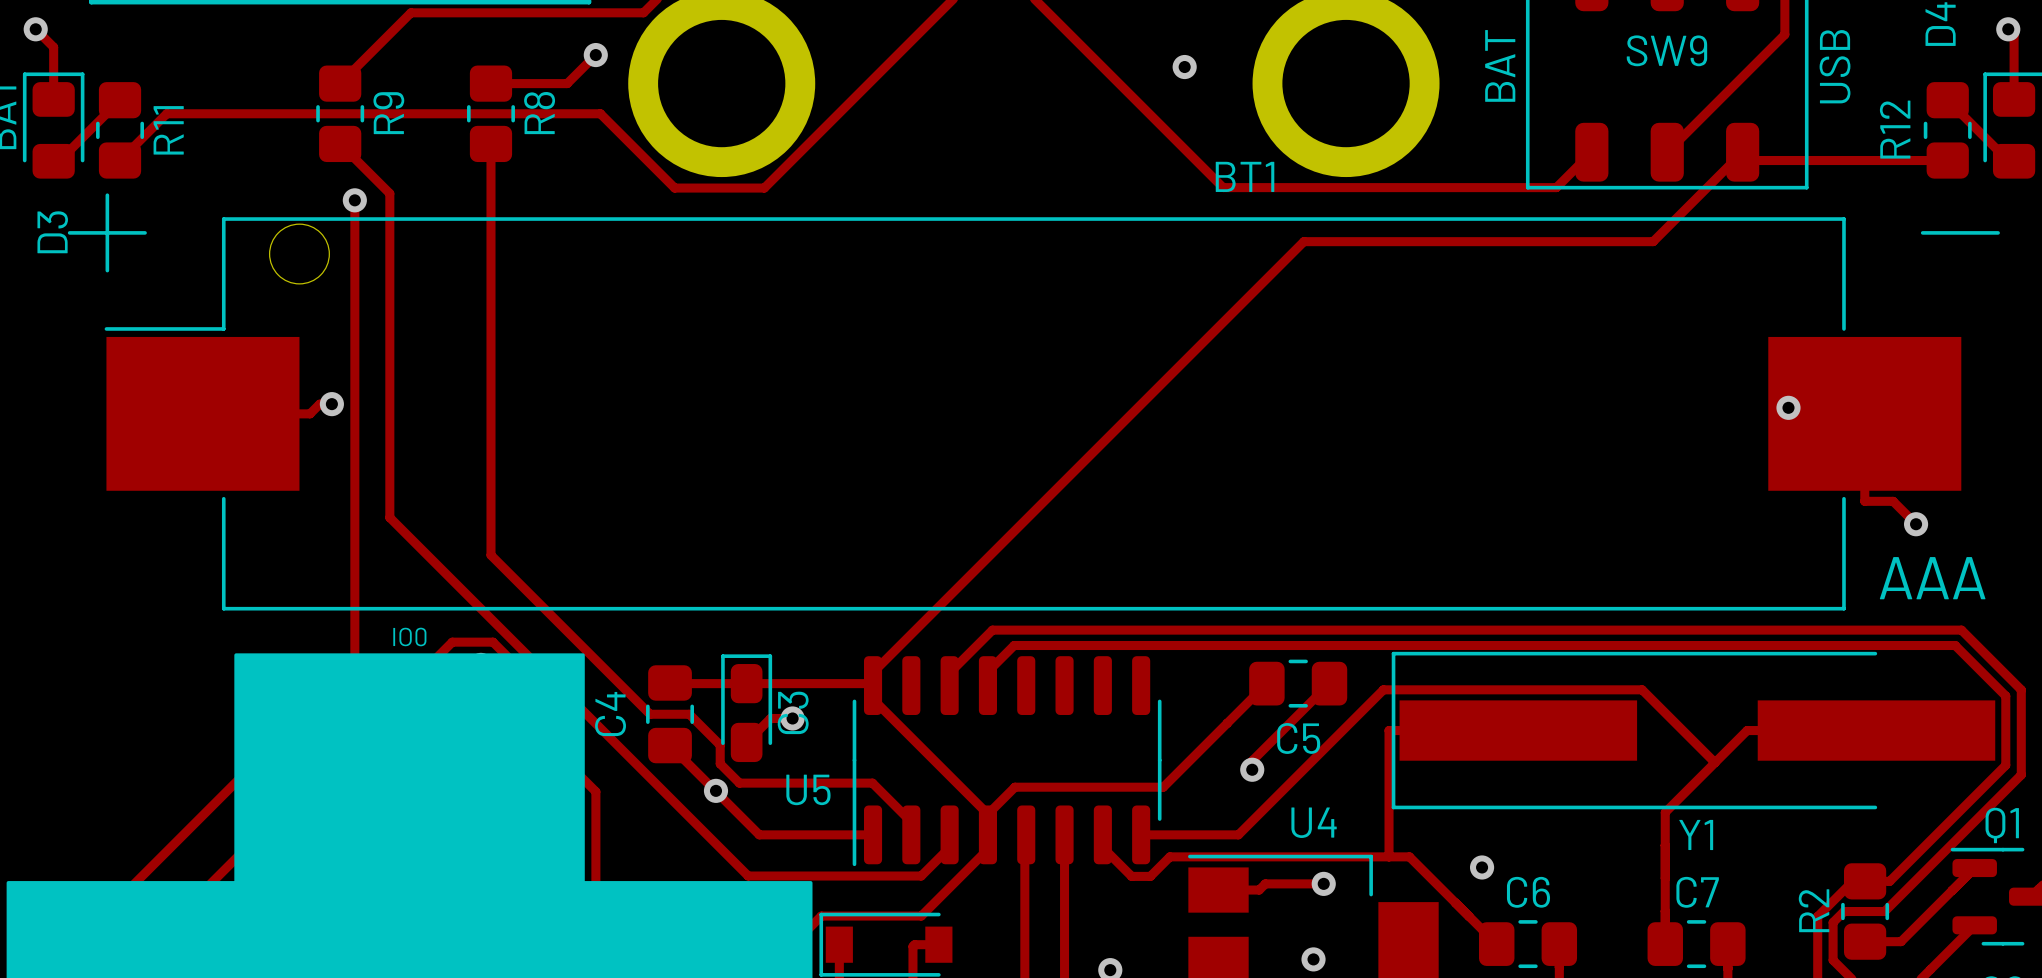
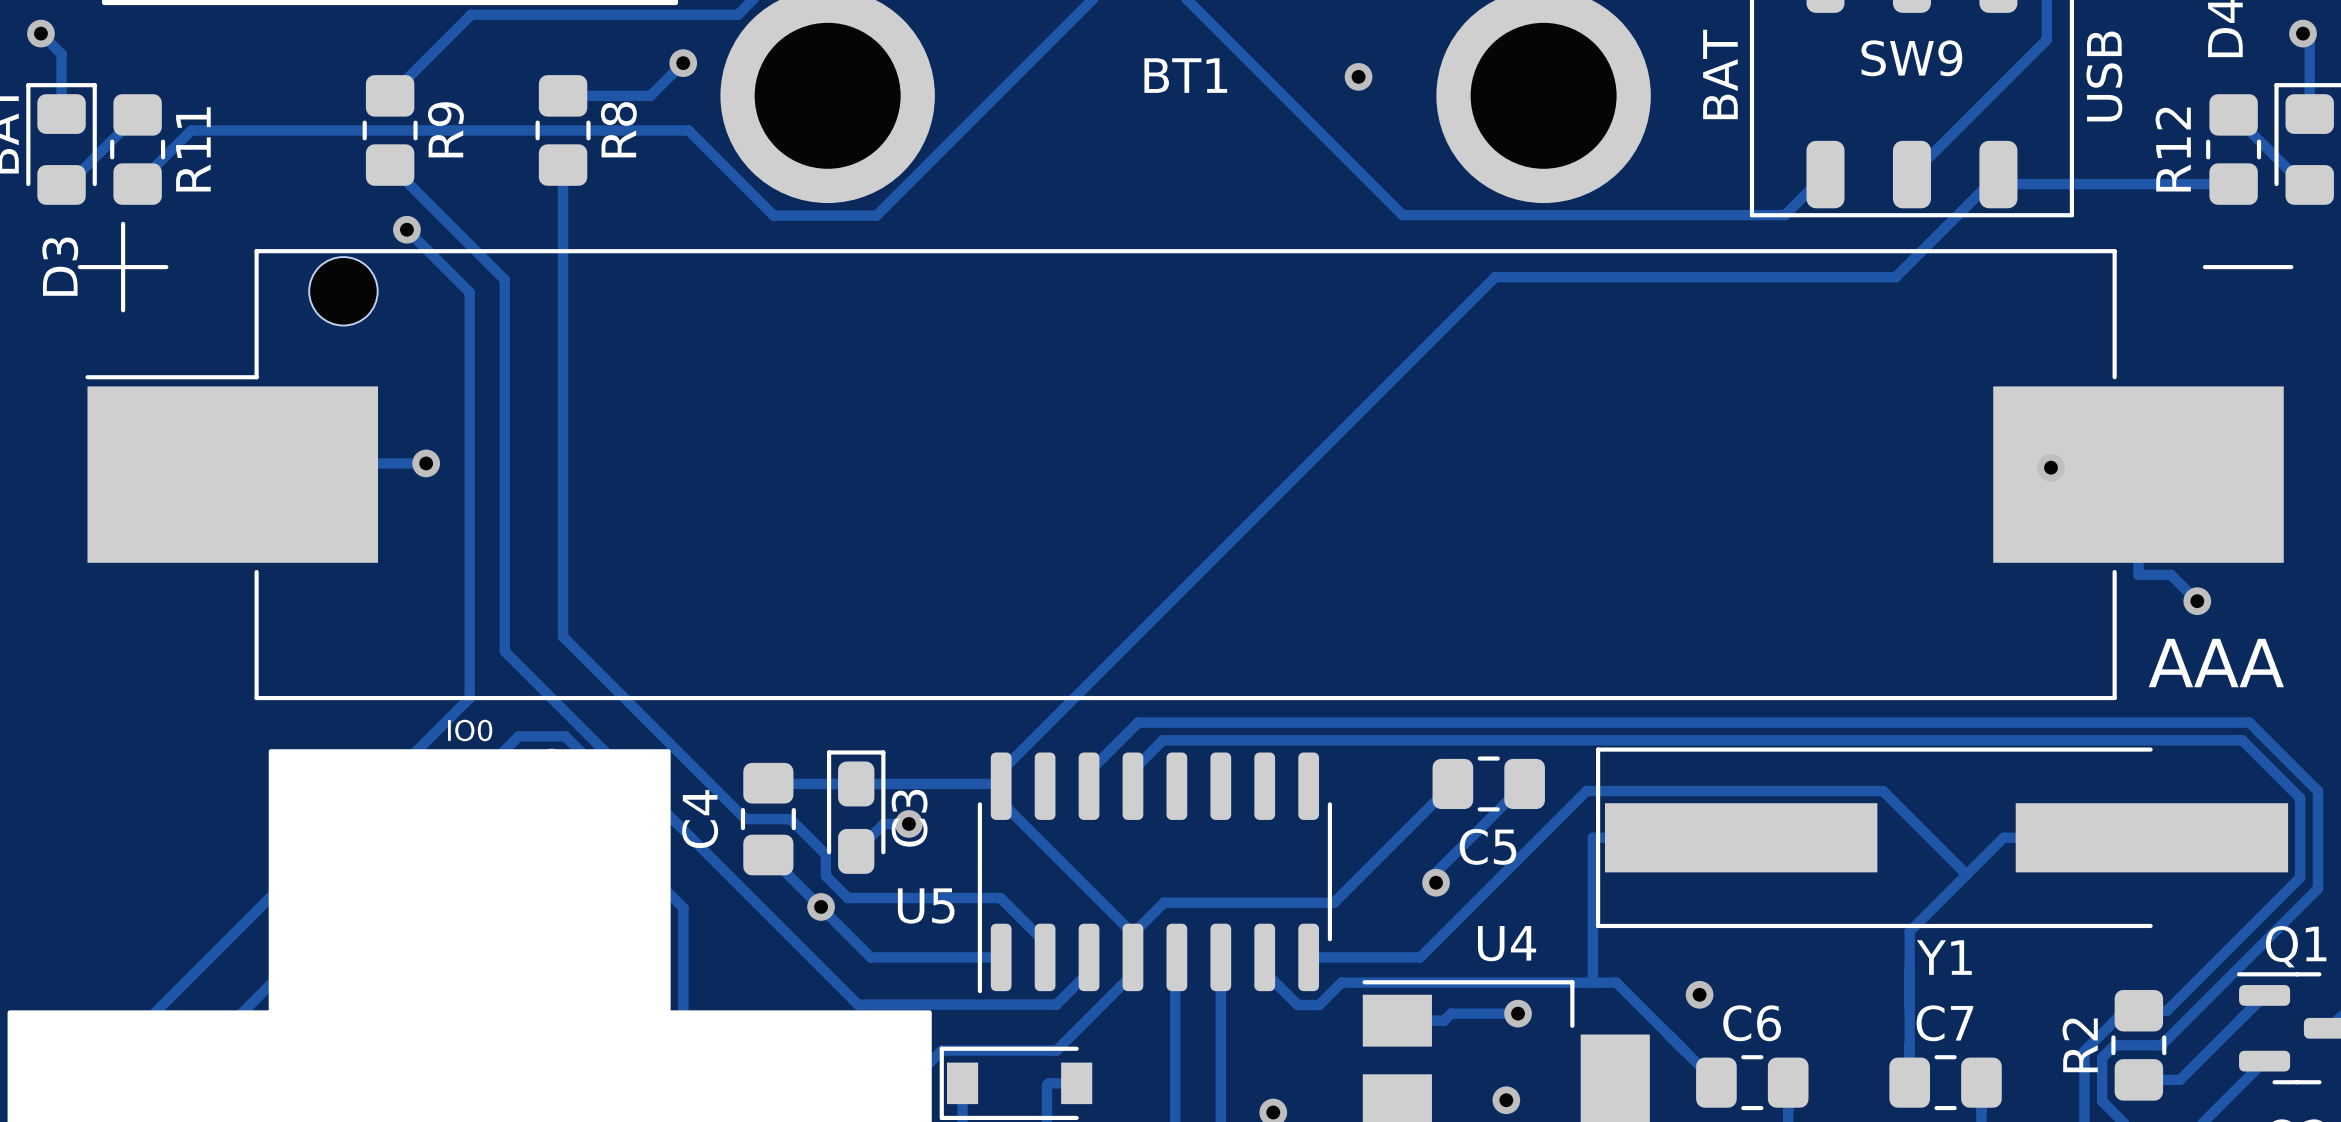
BT1 name position: BT1 (1245, 176) -> BT1 (1185, 75)
BT1 footprint: [67, 193, 2000, 611] -> [77, 221, 2294, 701]
track: (389, 193) (389, 517) (440, 568) -> (447, 221) (504, 279) (504, 651)
track: (354, 200) (354, 663) -> (406, 229) (469, 292) (469, 698) (406, 760)
track: none -> (380, 463) (426, 463)
via position: (331, 404) -> (426, 463)

